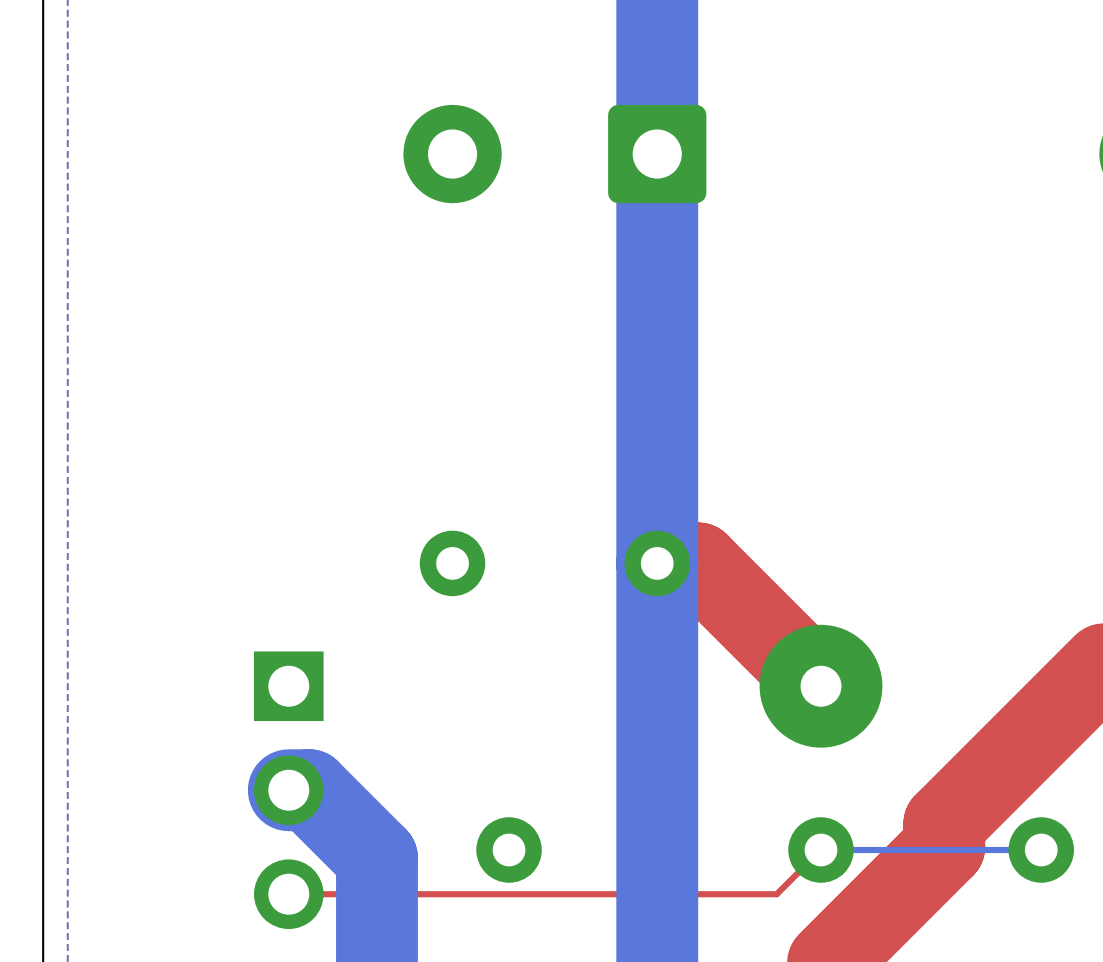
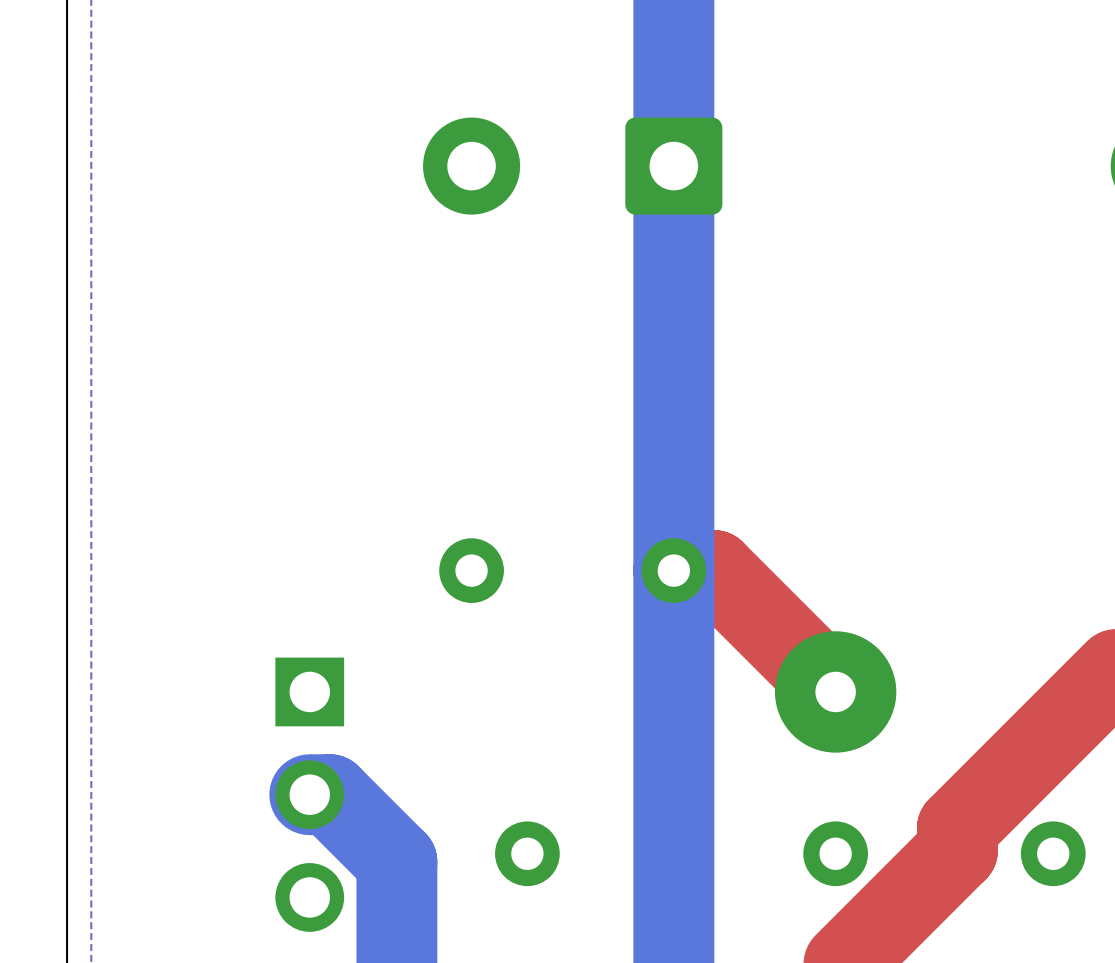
top track: (821, 850) (776, 894) (288, 894) -> none
bottom track: (1041, 850) (821, 850) -> none

